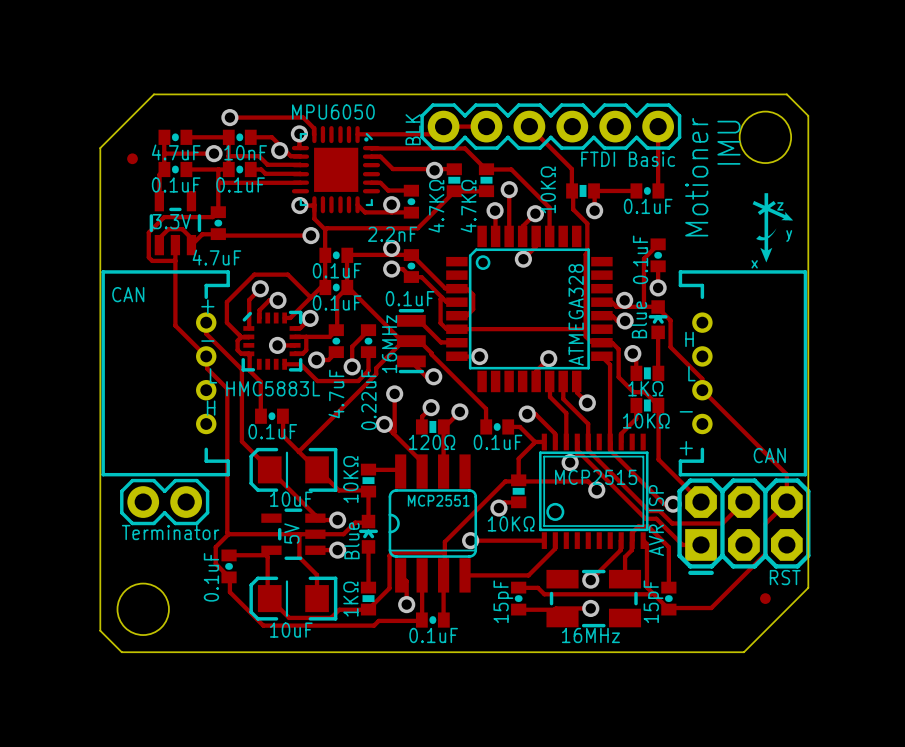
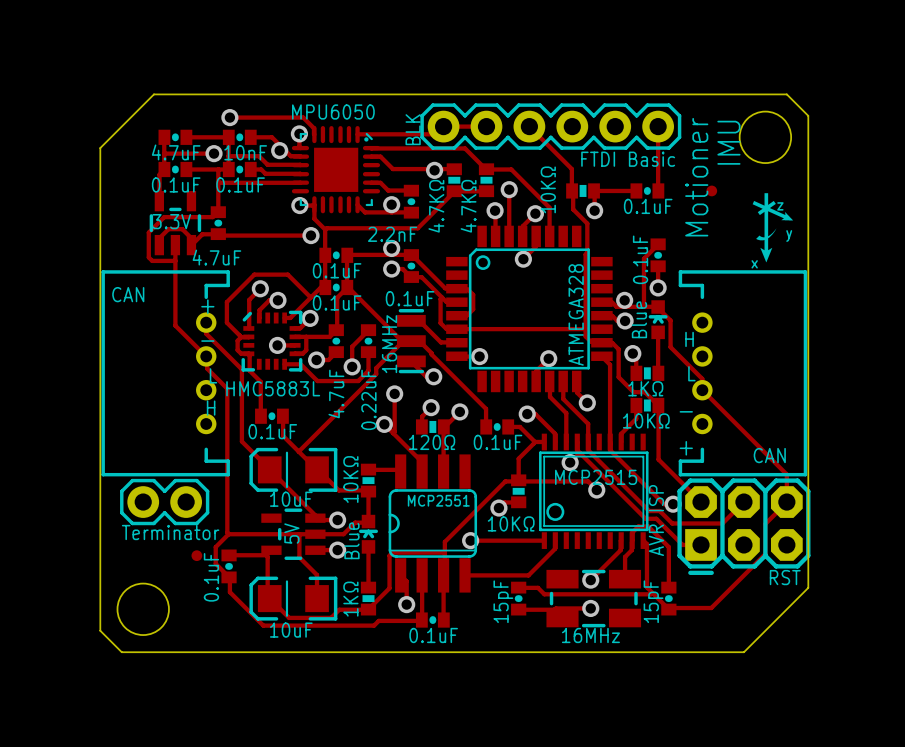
part: (132, 158) -> none
part: none -> (711, 190)
part: none -> (196, 555)
part: (765, 598) -> none

